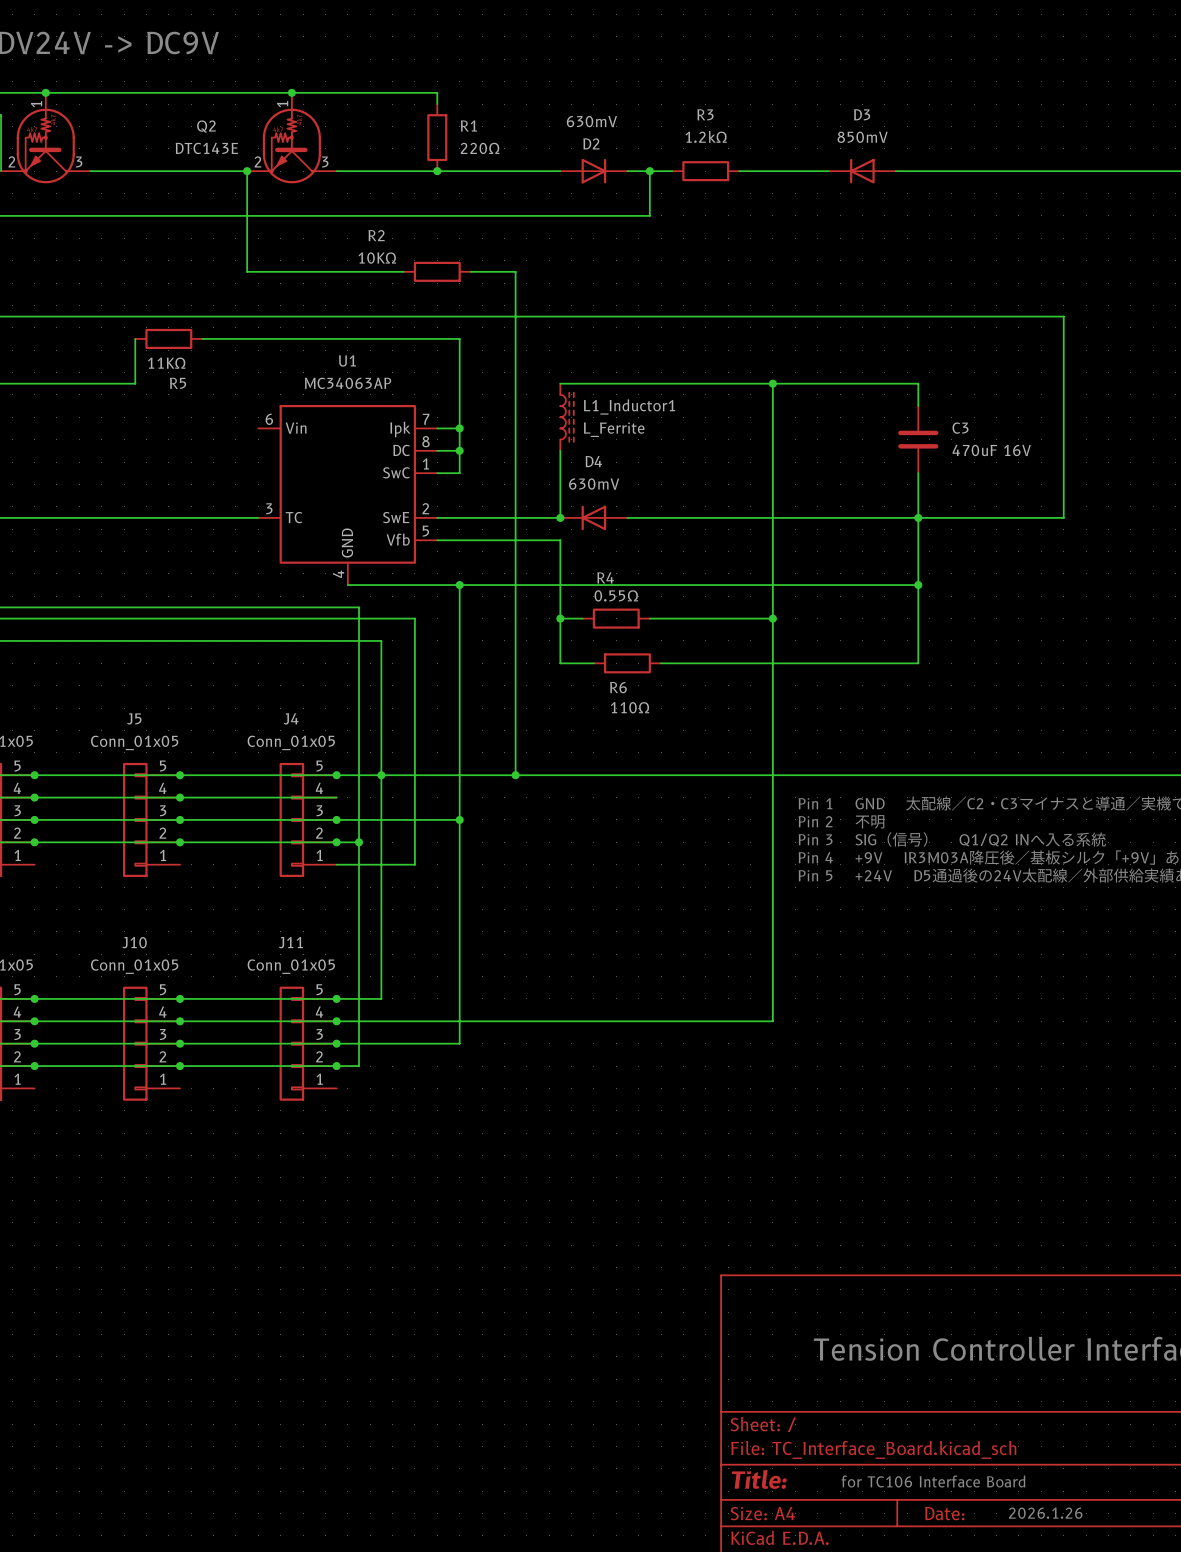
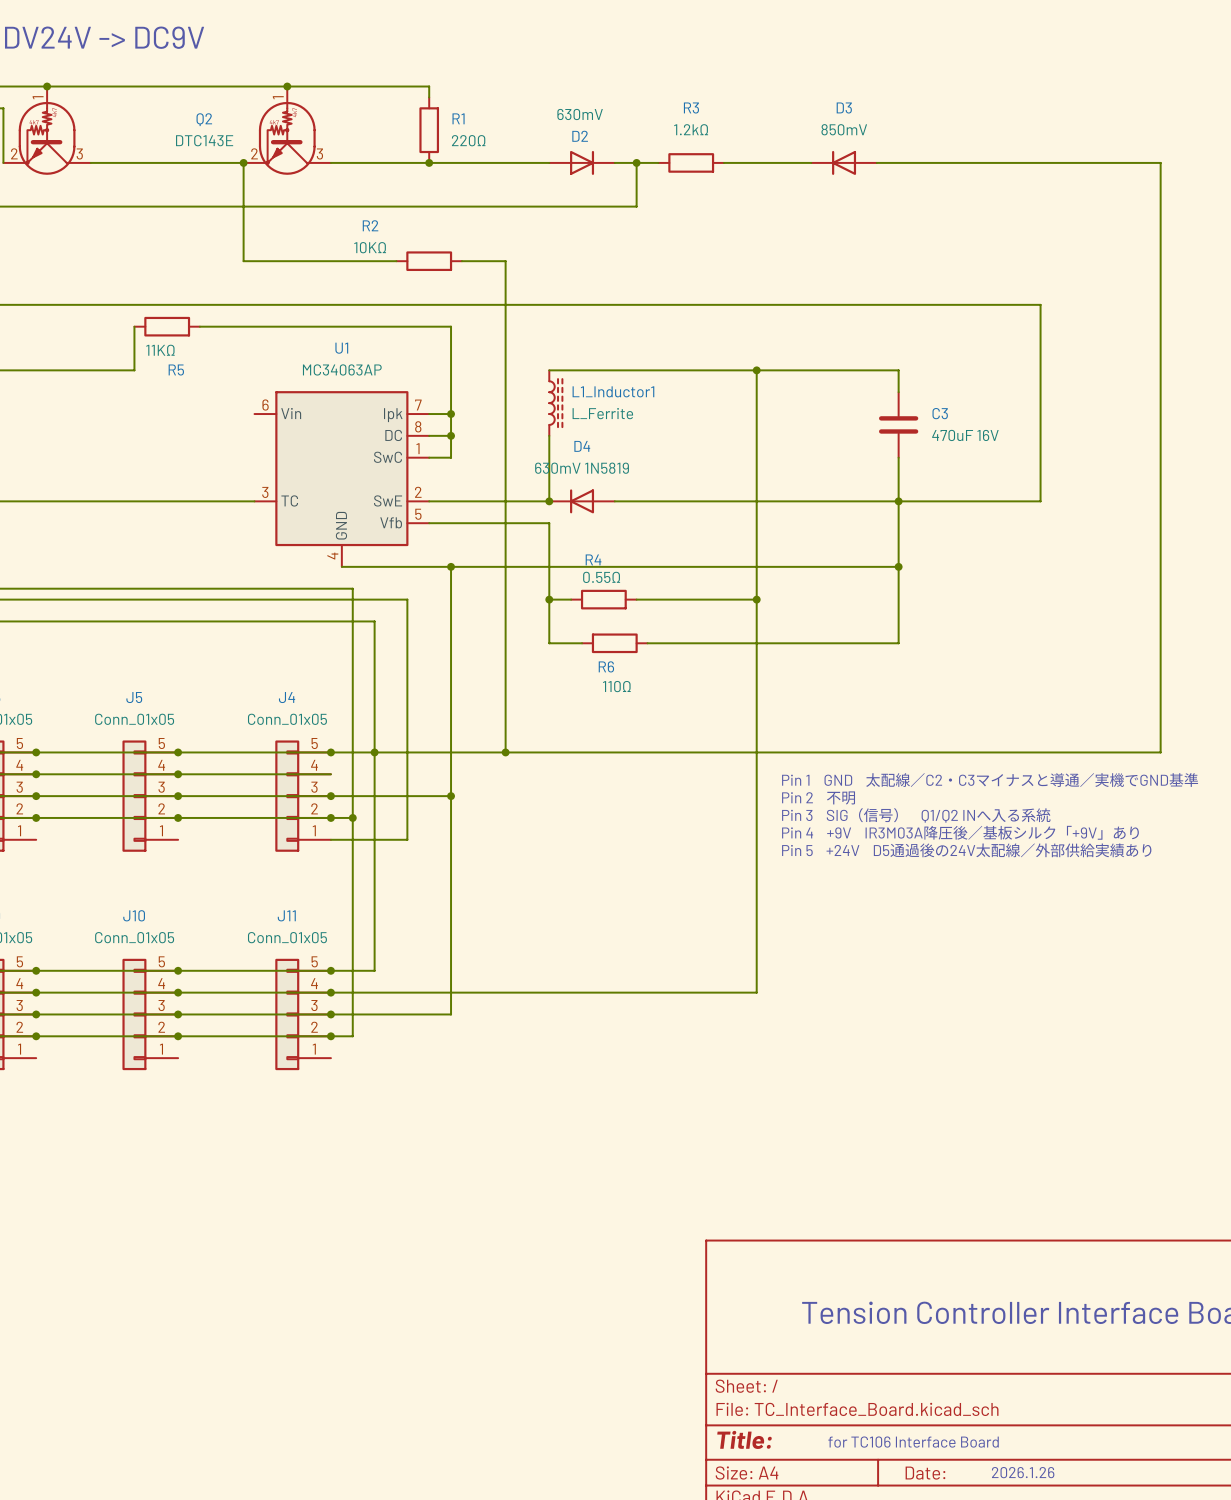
D4 value: 630mV (594, 484) -> 630mV 1N5819 (582, 468)

